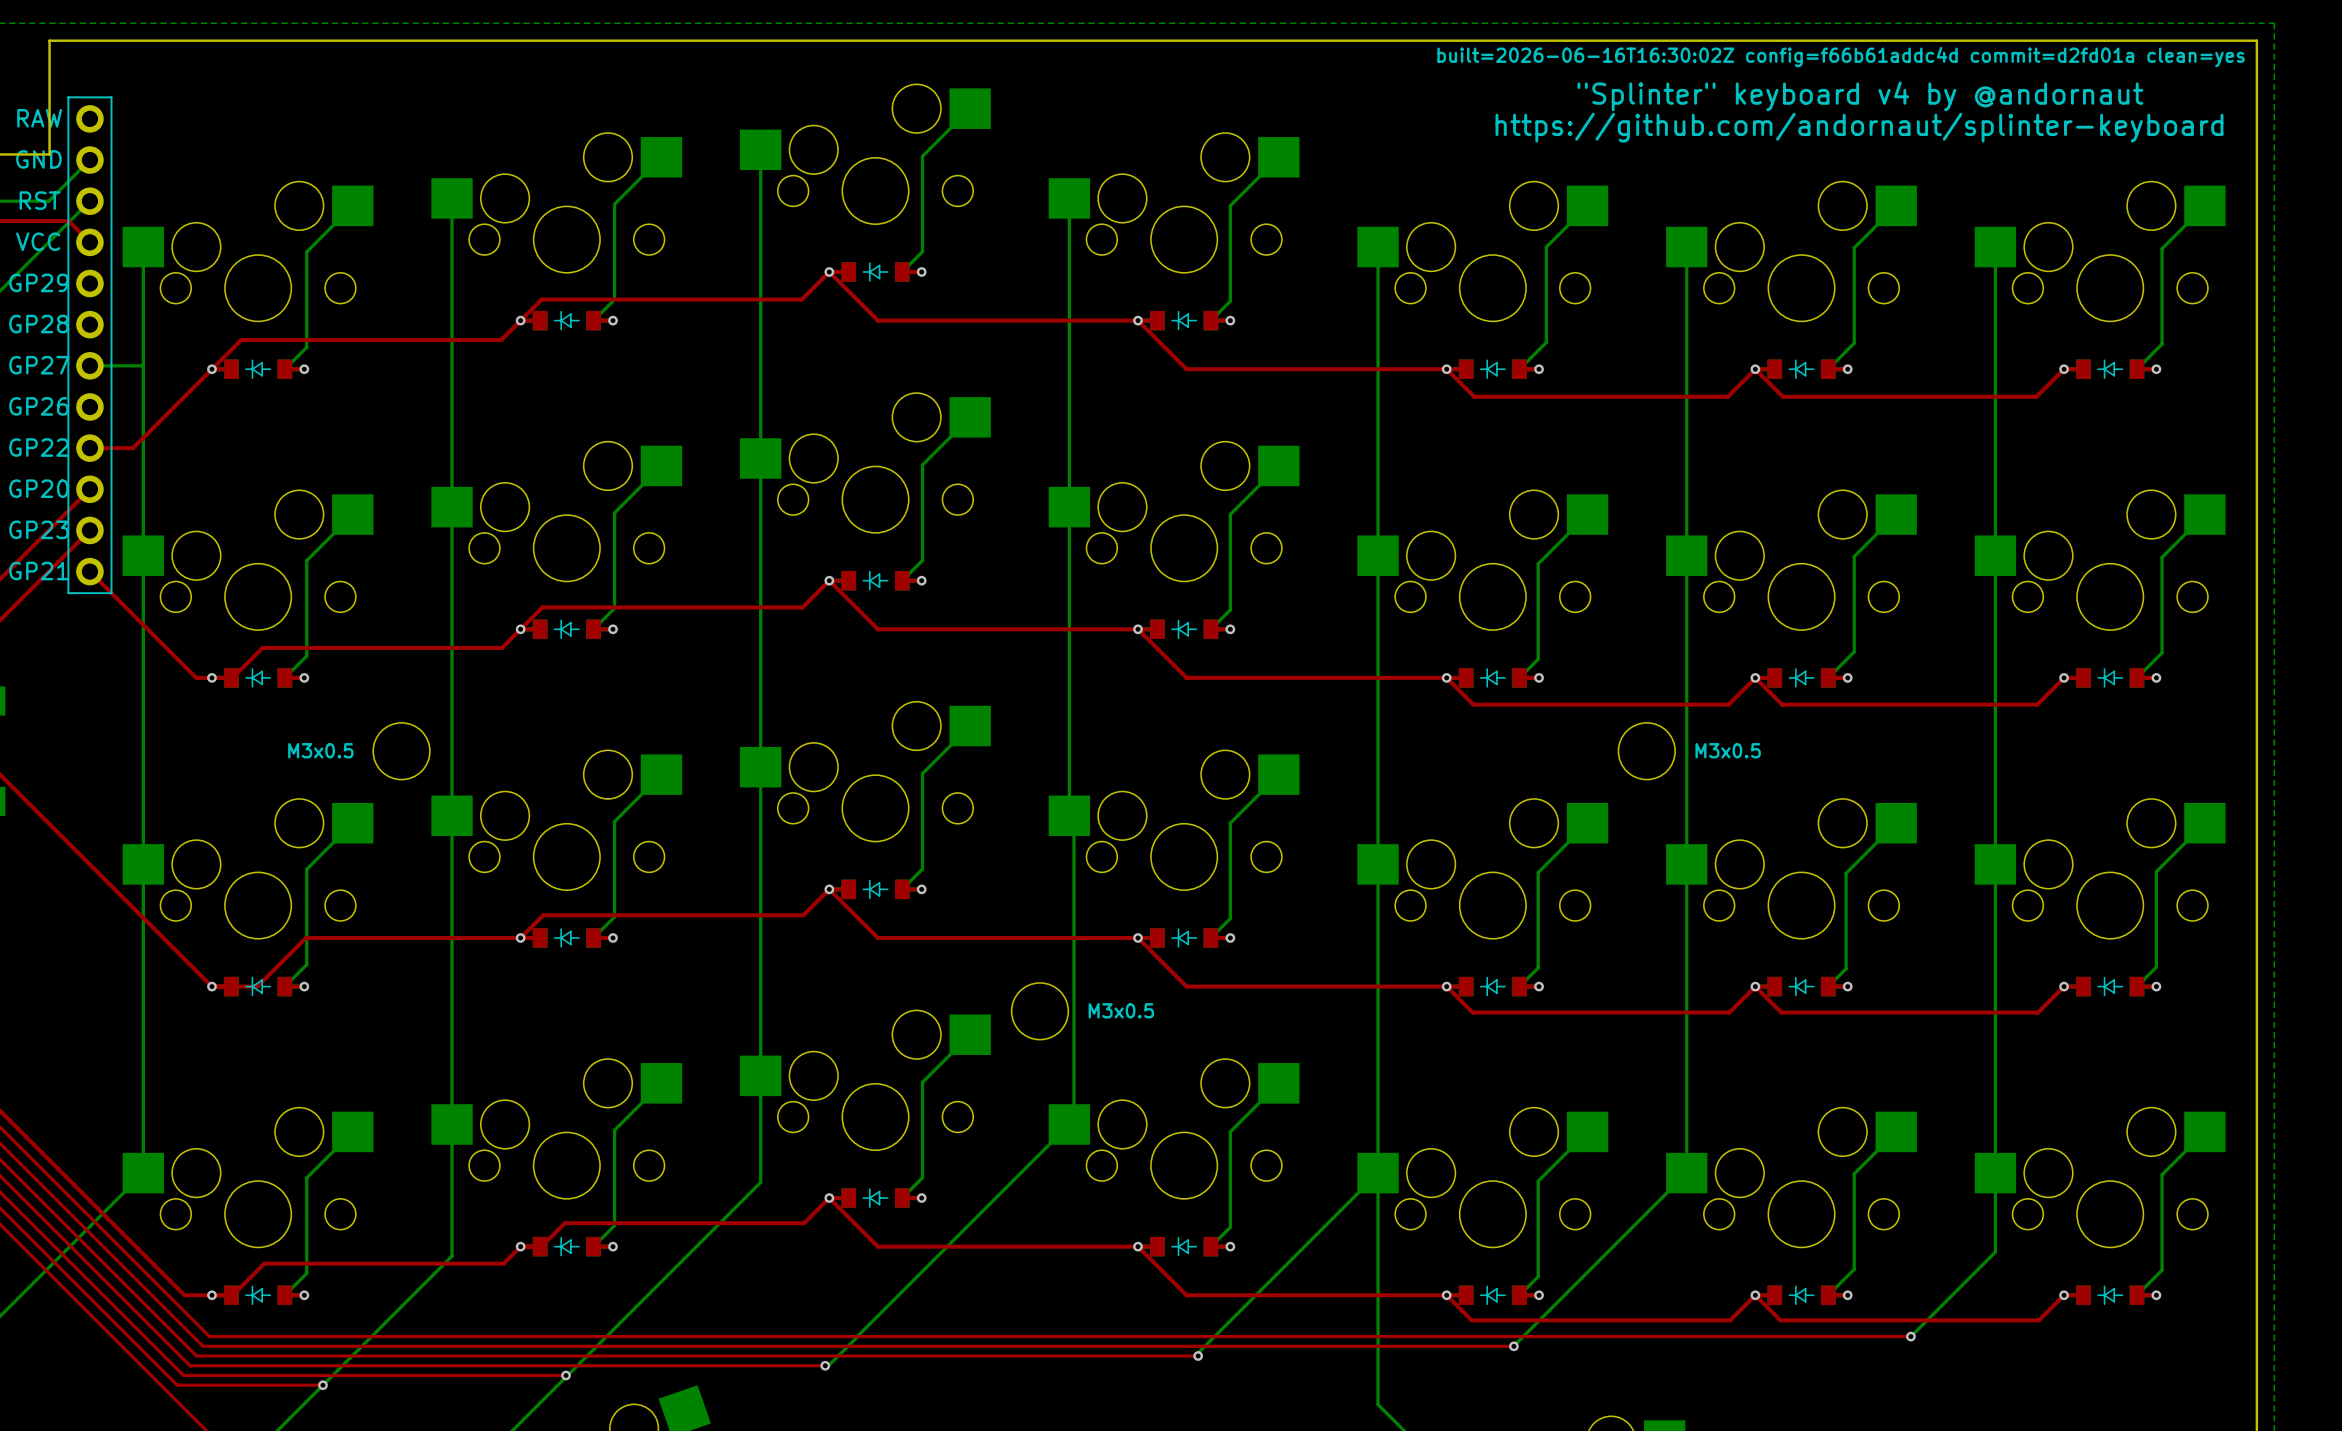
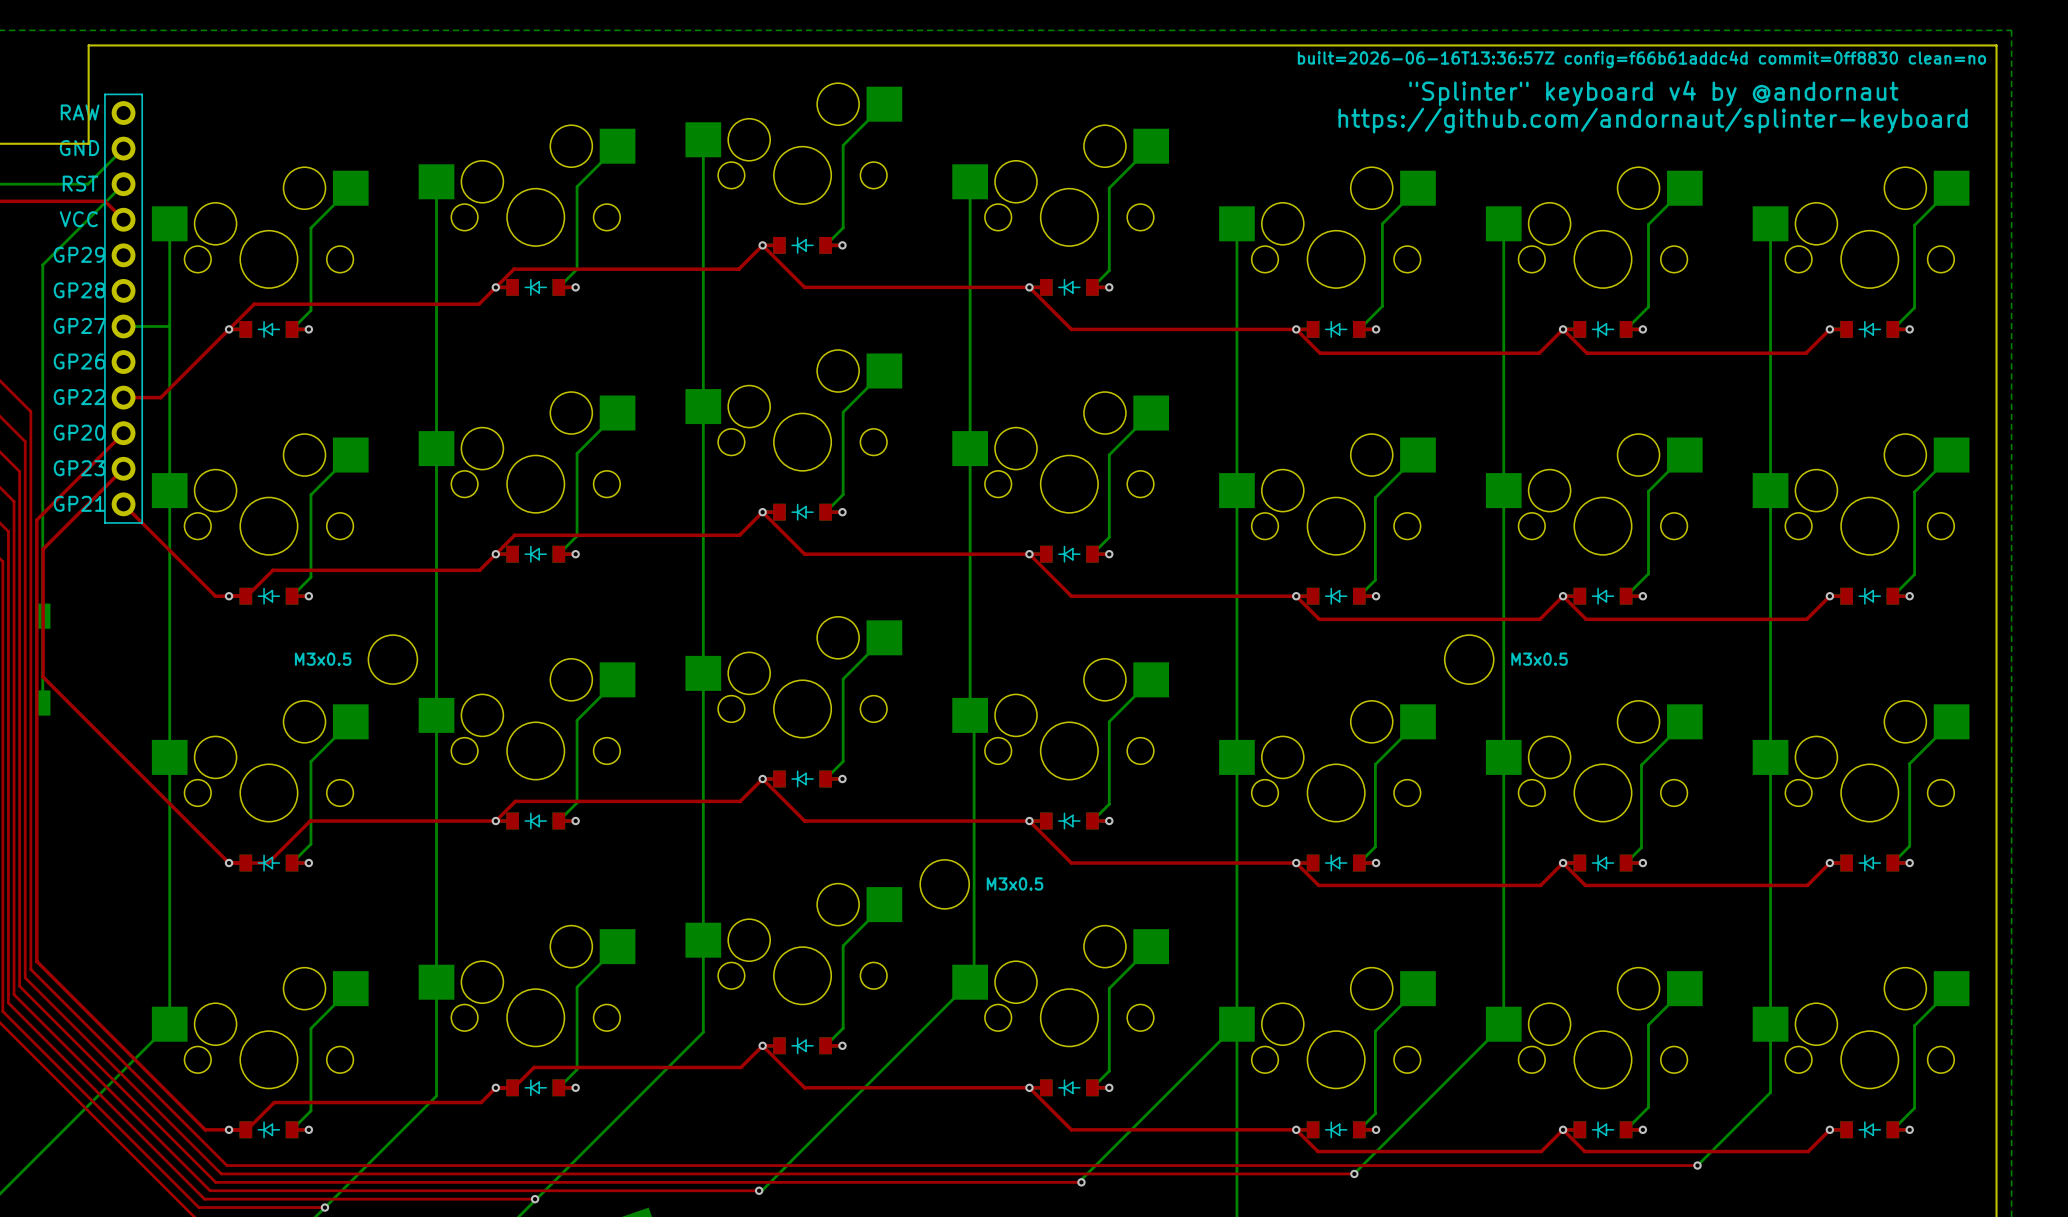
text: built=2026-06-16T16:30:02Z config=f66b61addc4d commit=d2fd01a clean=yes (1841, 57) -> built=2026-06-16T13:36:57Z config=f66b61addc4d commit=0ff8830 clean=no (1641, 59)

